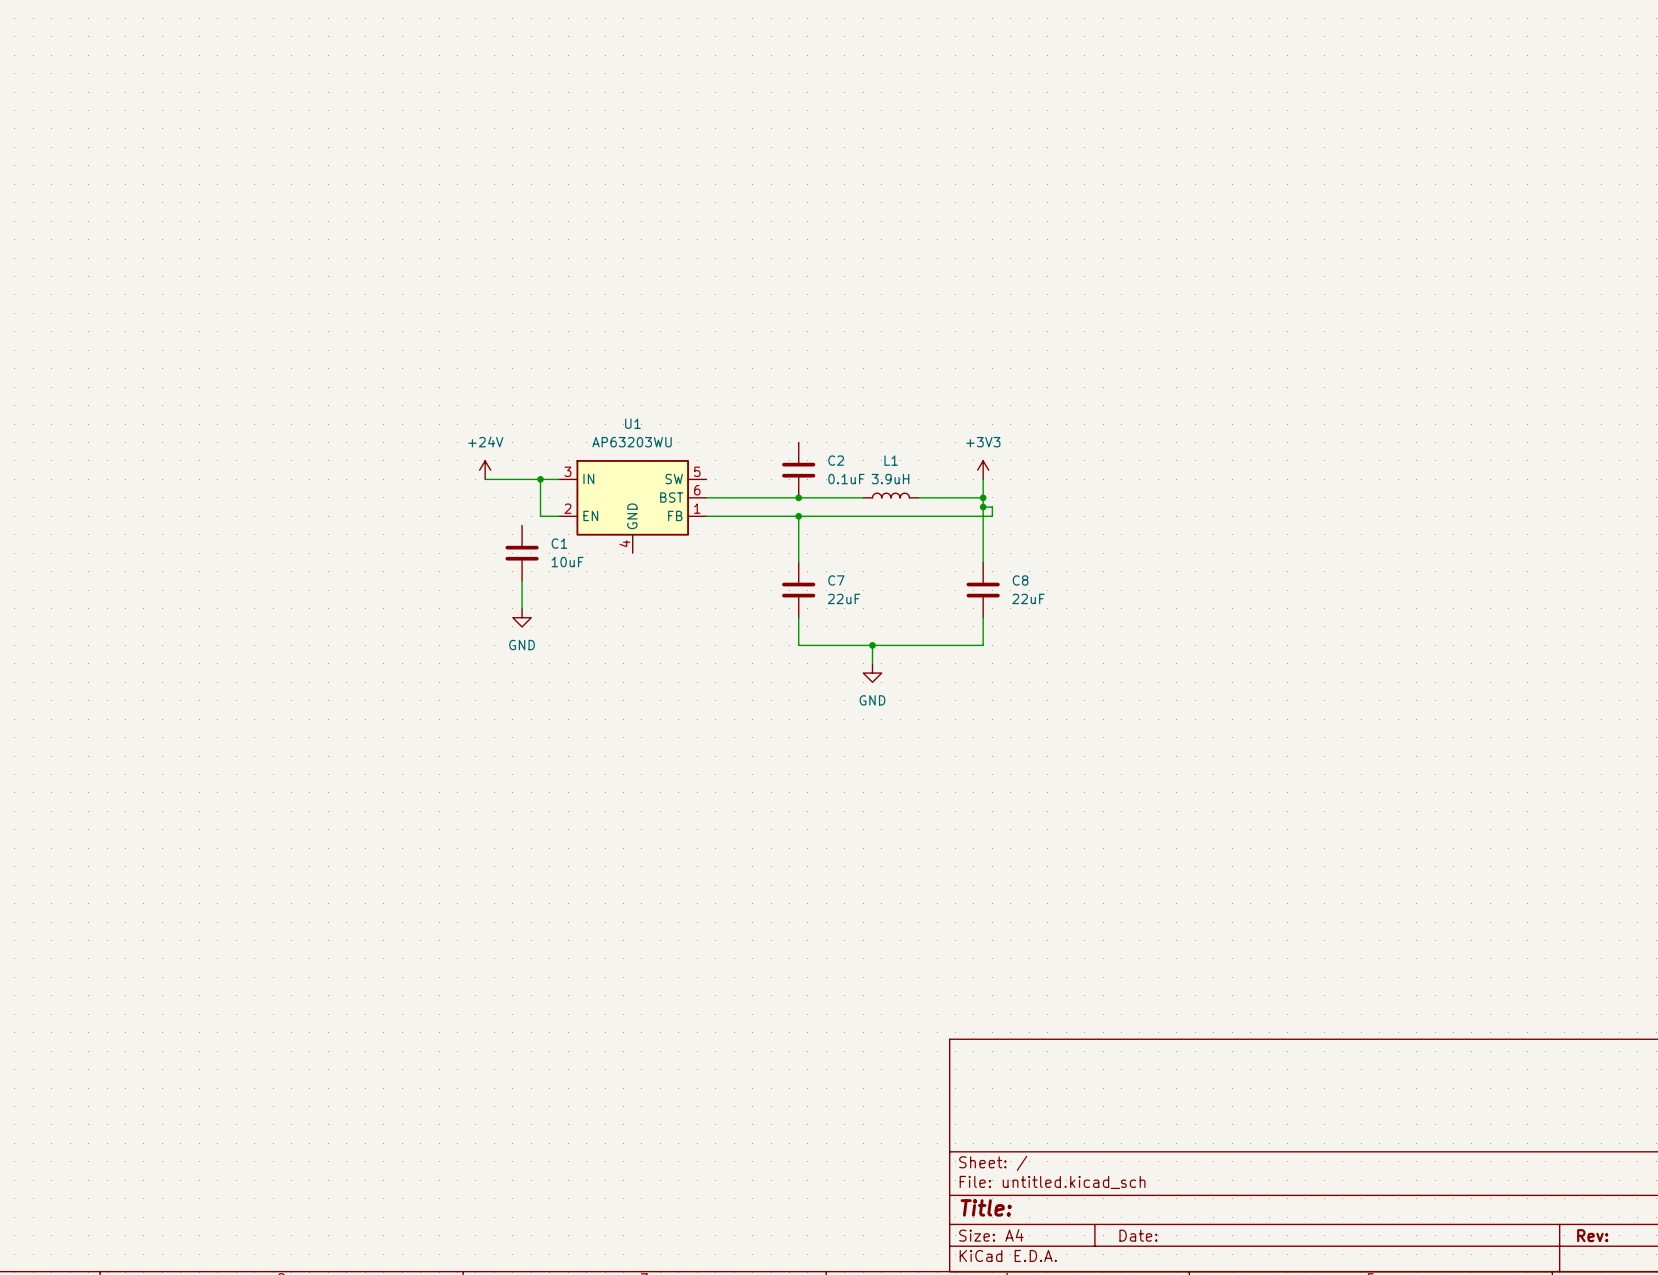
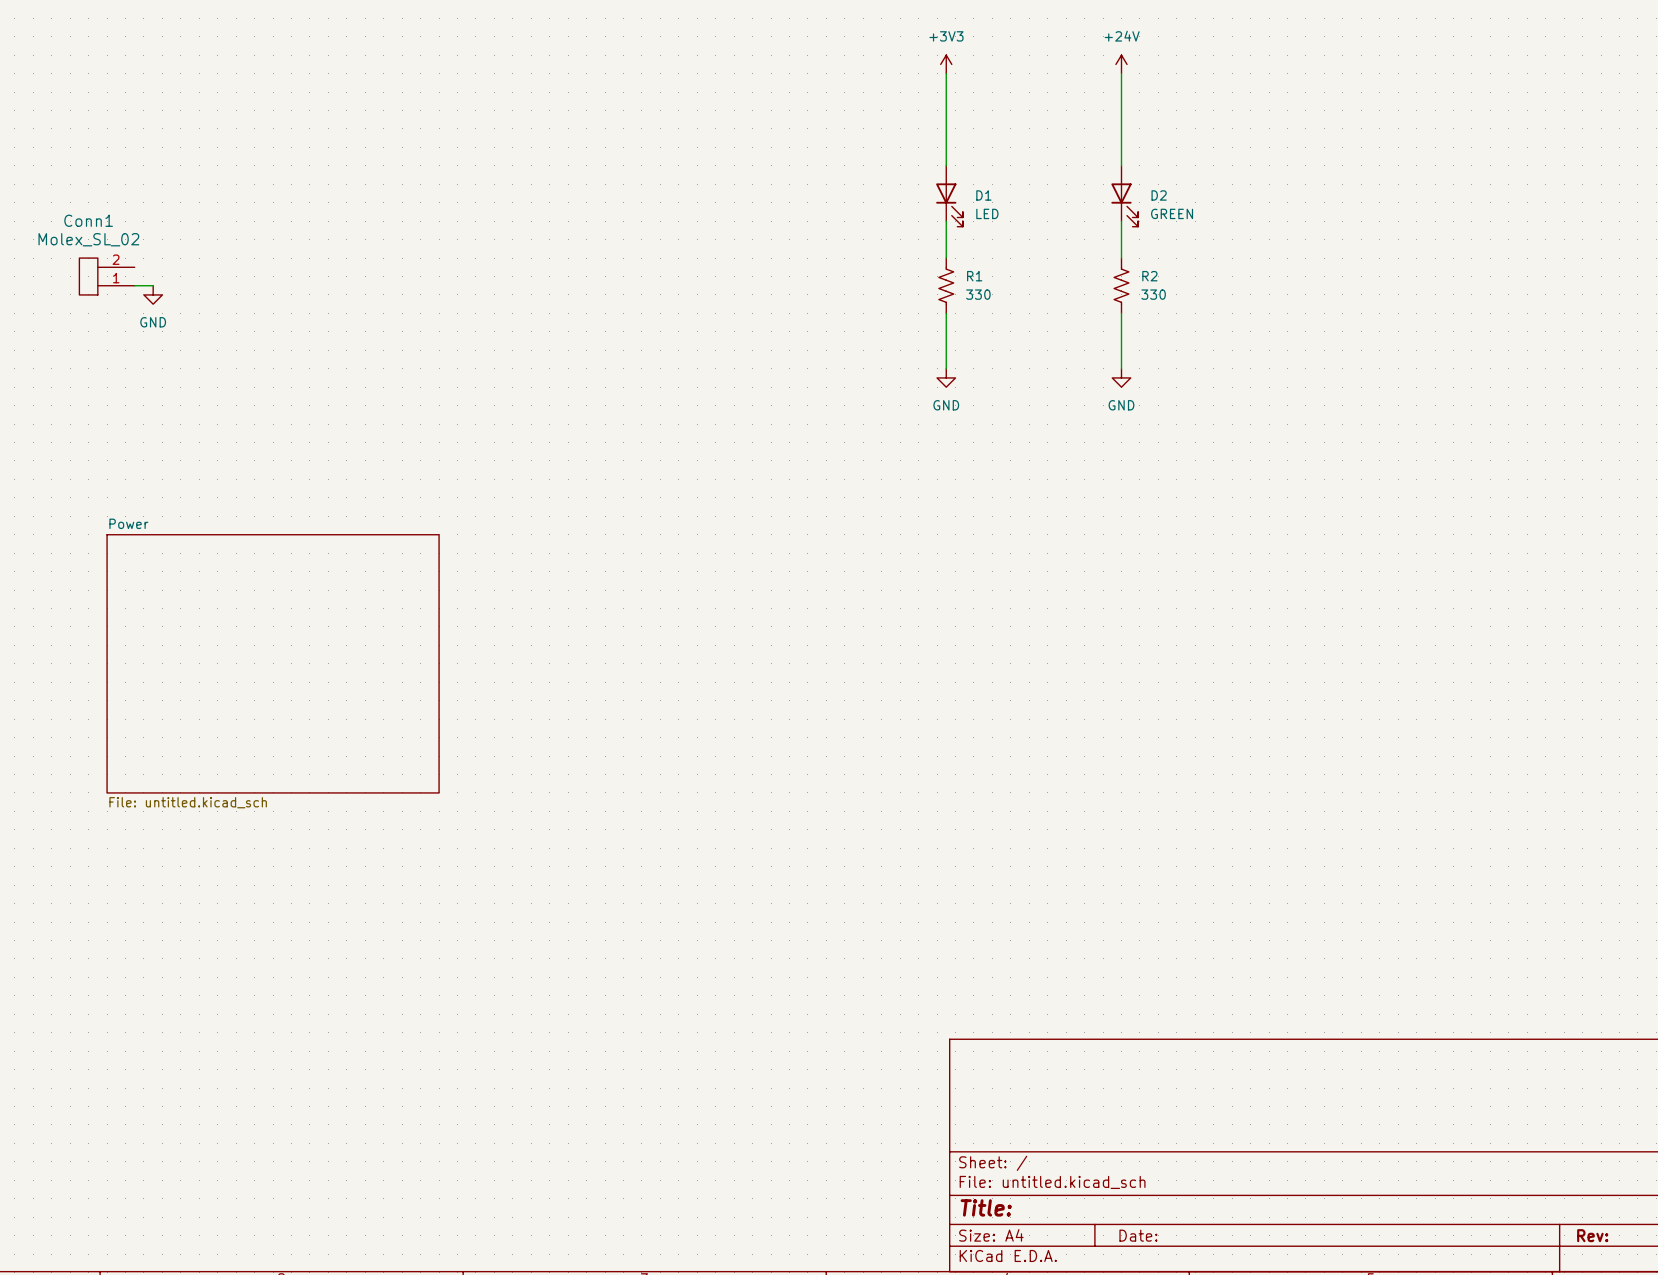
power symbol: none -> +3V3 (946, 64)
power symbol: none -> +24V (1121, 64)
wire: none -> (946, 73) (946, 165)
wire: none -> (1121, 73) (1121, 165)
D1: none -> LED (949, 196)
D2: none -> GREEN (1124, 196)
wire: none -> (946, 221) (946, 258)
wire: none -> (1121, 221) (1121, 258)
Conn1: none -> Molex_SL_02 (107, 276)
wire: none -> (134, 285) (153, 285)
R1: none -> 330 (946, 285)
R2: none -> 330 (1121, 285)
power symbol: none -> GND (153, 294)
wire: none -> (946, 313) (946, 368)
wire: none -> (1121, 313) (1121, 368)
power symbol: none -> GND (946, 377)
power symbol: none -> GND (1121, 377)
power symbol: +24V (485, 470) -> none
C2: 0.1uF (798, 470) -> none
power symbol: +3V3 (983, 470) -> none
wire: (485, 479) (558, 479) -> none
wire: (540, 479) (540, 516) (558, 516) -> none
junction: (540, 479) -> none
wire: (983, 479) (983, 562) -> none
L1: 3.9uH (890, 495) -> none
wire: (706, 497) (863, 497) -> none
junction: (798, 497) -> none
wire: (918, 497) (983, 497) -> none
junction: (983, 497) -> none
U1: AP63203WU (632, 506) -> none
wire: (983, 507) (992, 507) (992, 516) (706, 516) -> none
junction: (983, 507) -> none
wire: (798, 516) (798, 562) -> none
junction: (798, 516) -> none
C1: 10uF (522, 553) -> none
wire: (522, 580) (522, 608) -> none
C7: 22uF (798, 590) -> none
C8: 22uF (983, 590) -> none
power symbol: GND (522, 617) -> none
wire: (798, 617) (798, 645) (983, 645) (983, 617) -> none
wire: (872, 645) (872, 663) -> none
junction: (872, 645) -> none
sheet Power: none -> File: untitled.kicad_sch (273, 663)
power symbol: GND (872, 673) -> none

